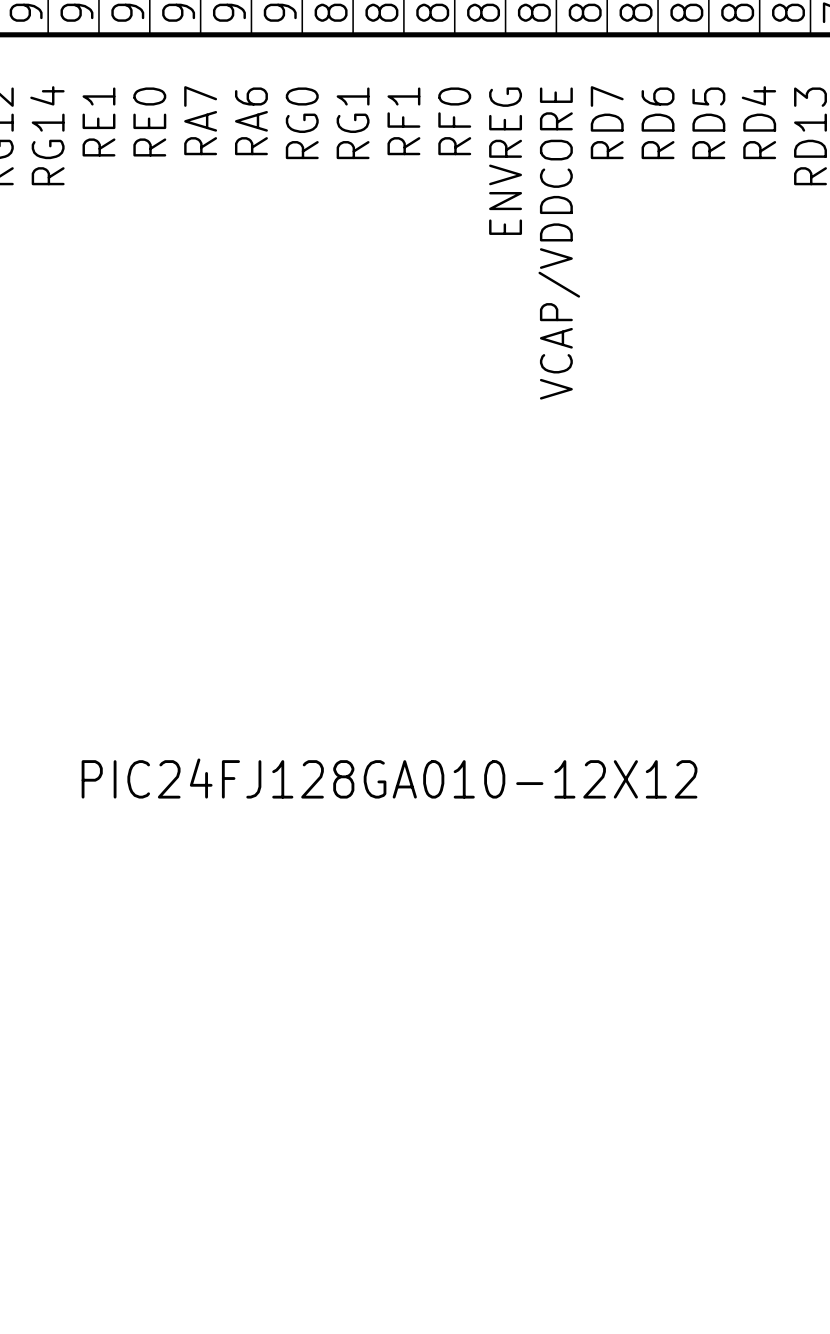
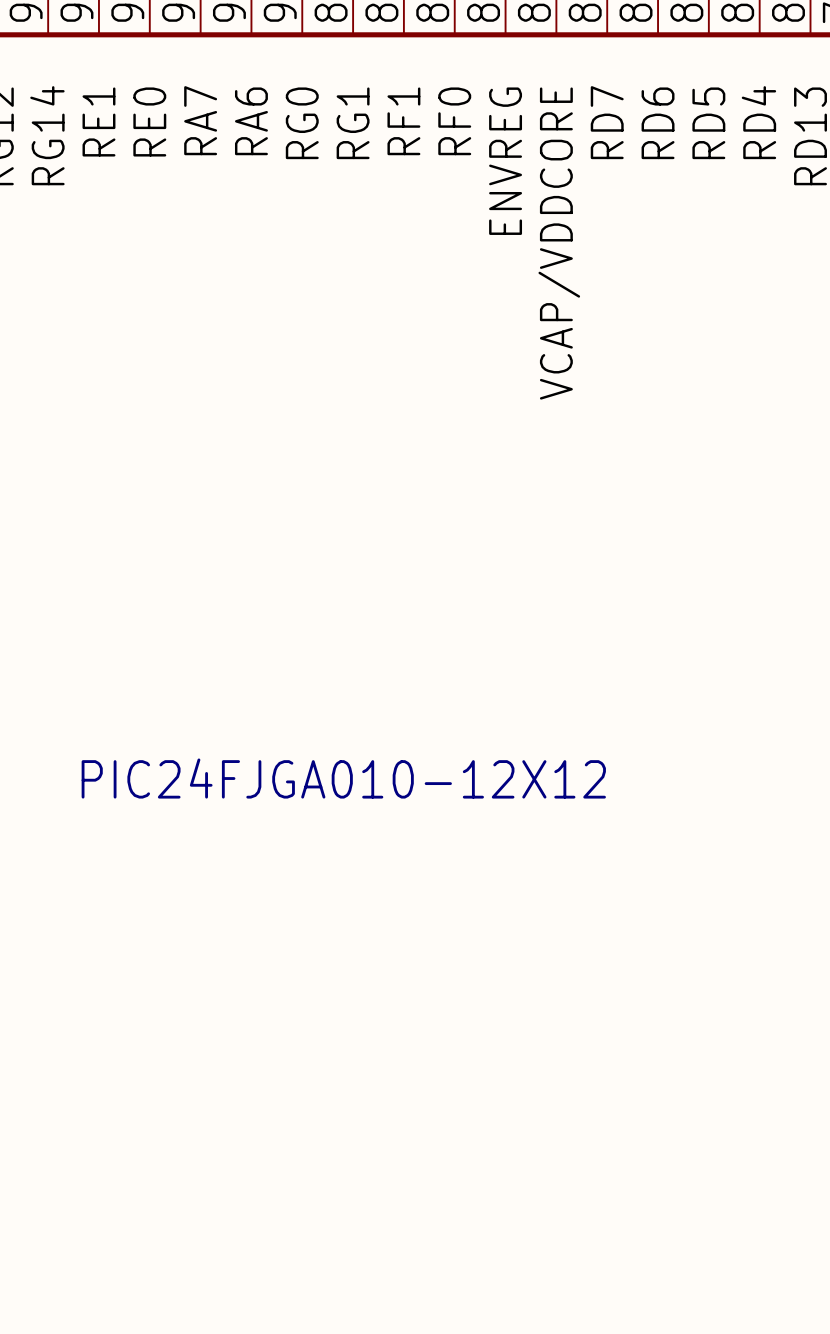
part value: PIC24FJ128GA010-12X12 (389, 778) -> PIC24FJGA010-12X12 (343, 778)

